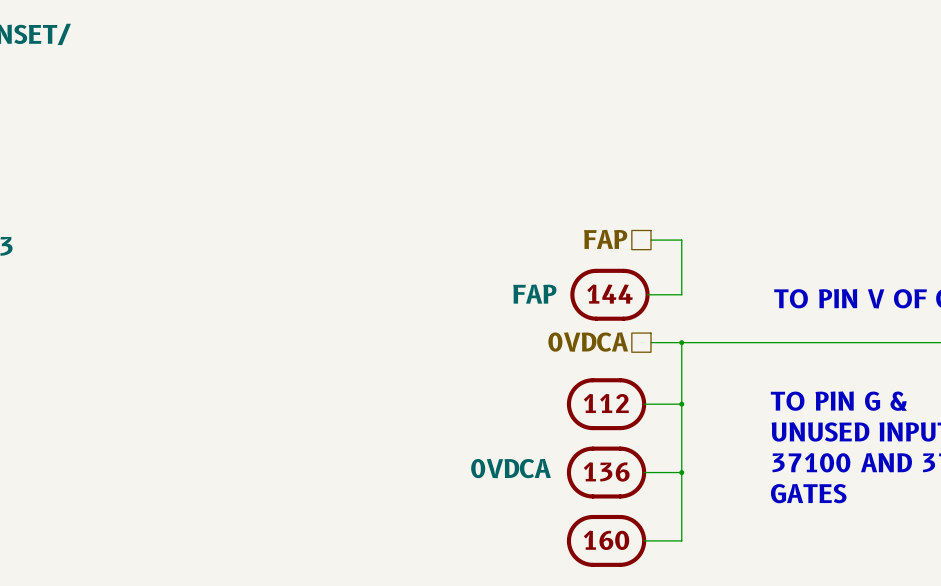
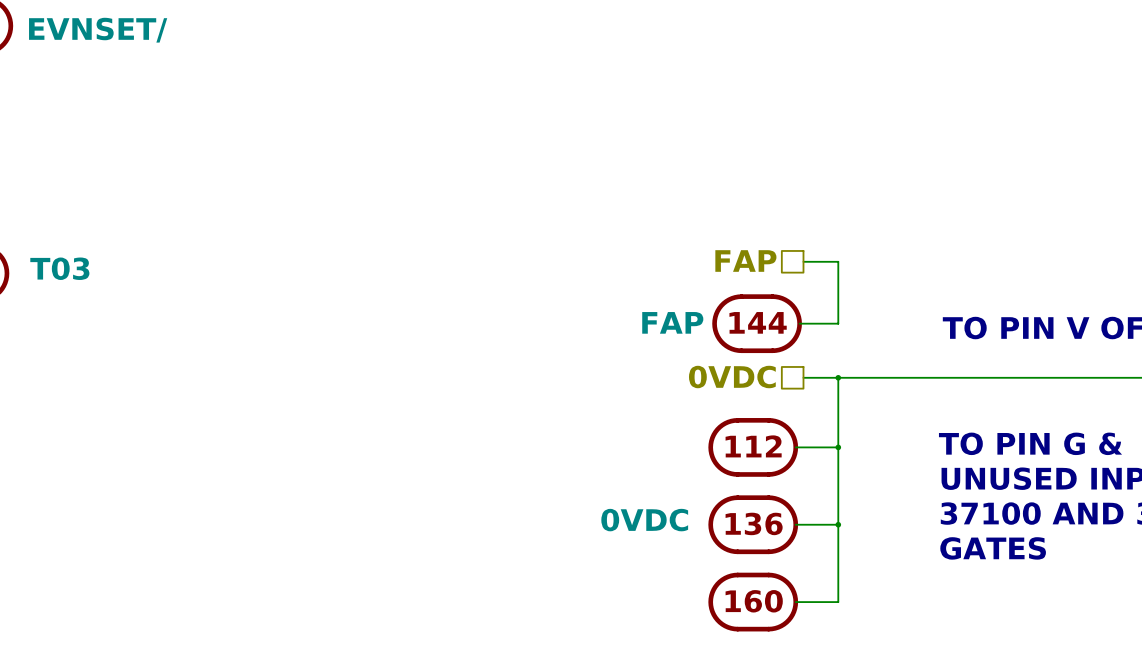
hierarchical label: 0VDCA (588, 342) -> 0VDC (732, 377)
part text: 0VDCA (511, 468) -> 0VDC (644, 520)

